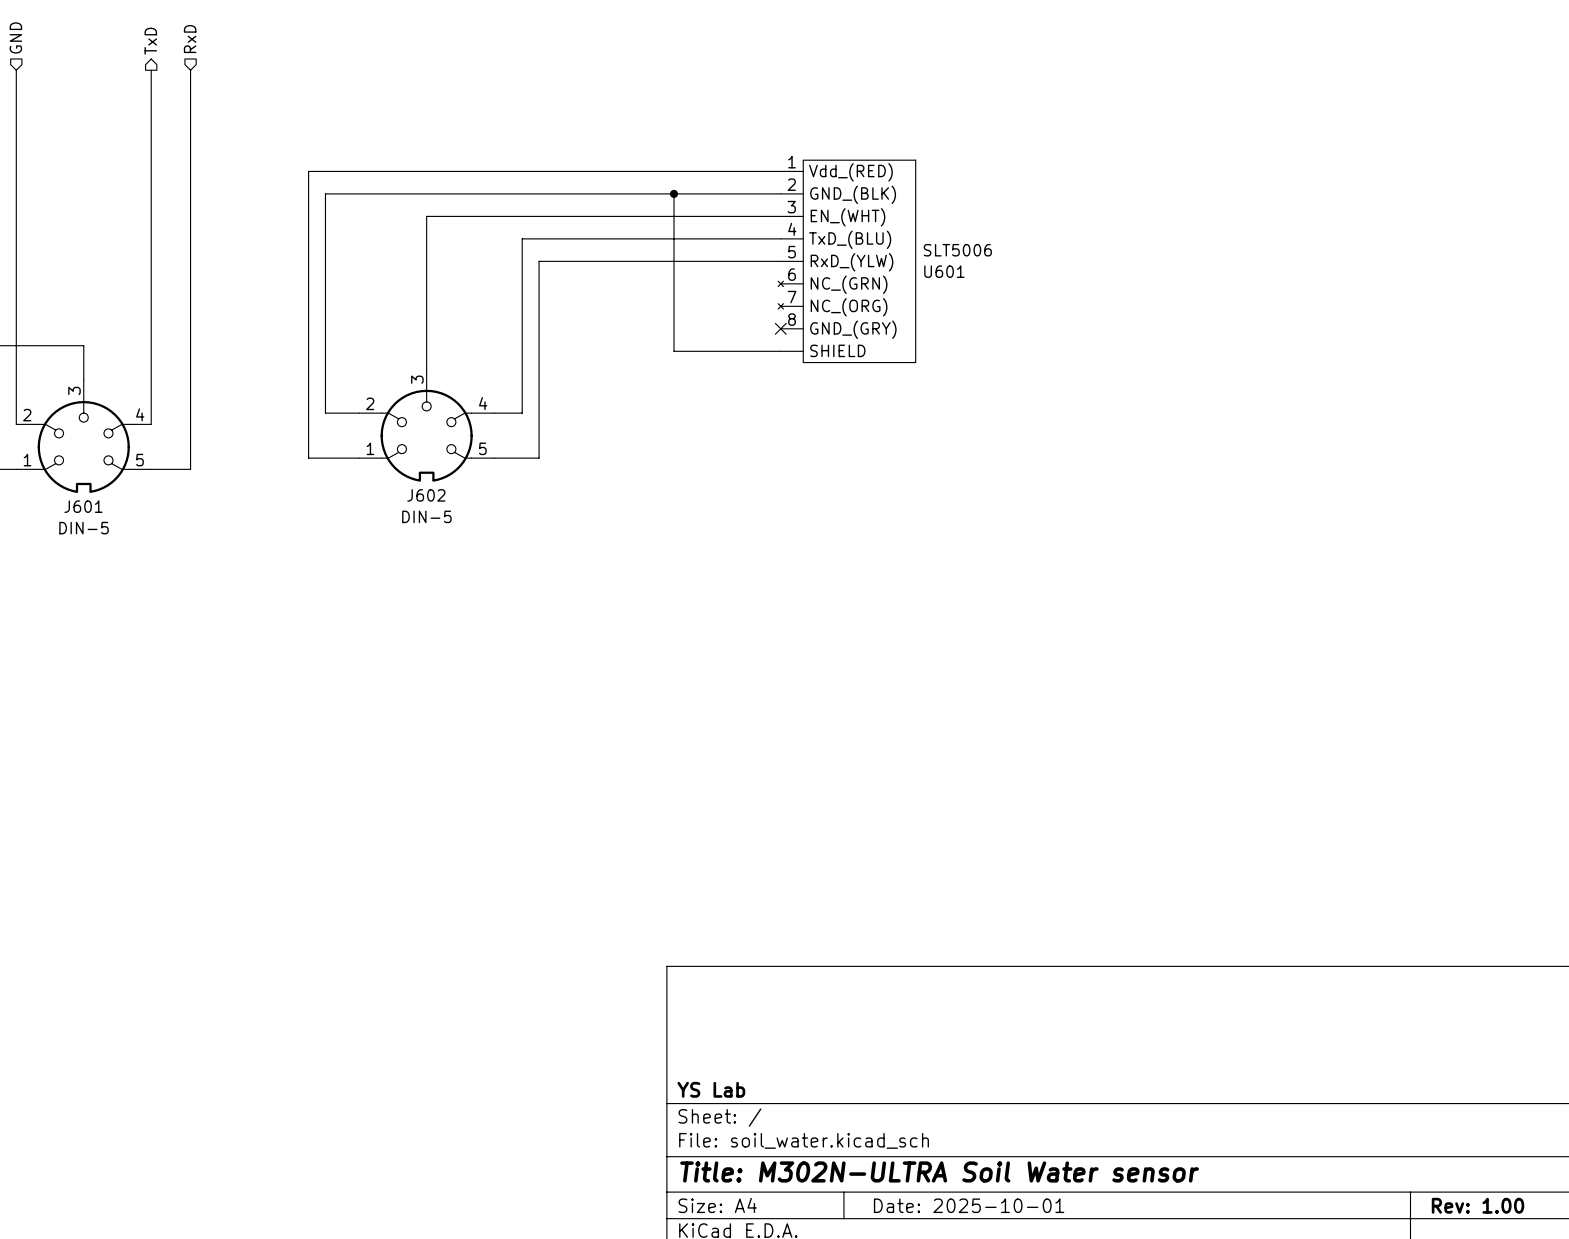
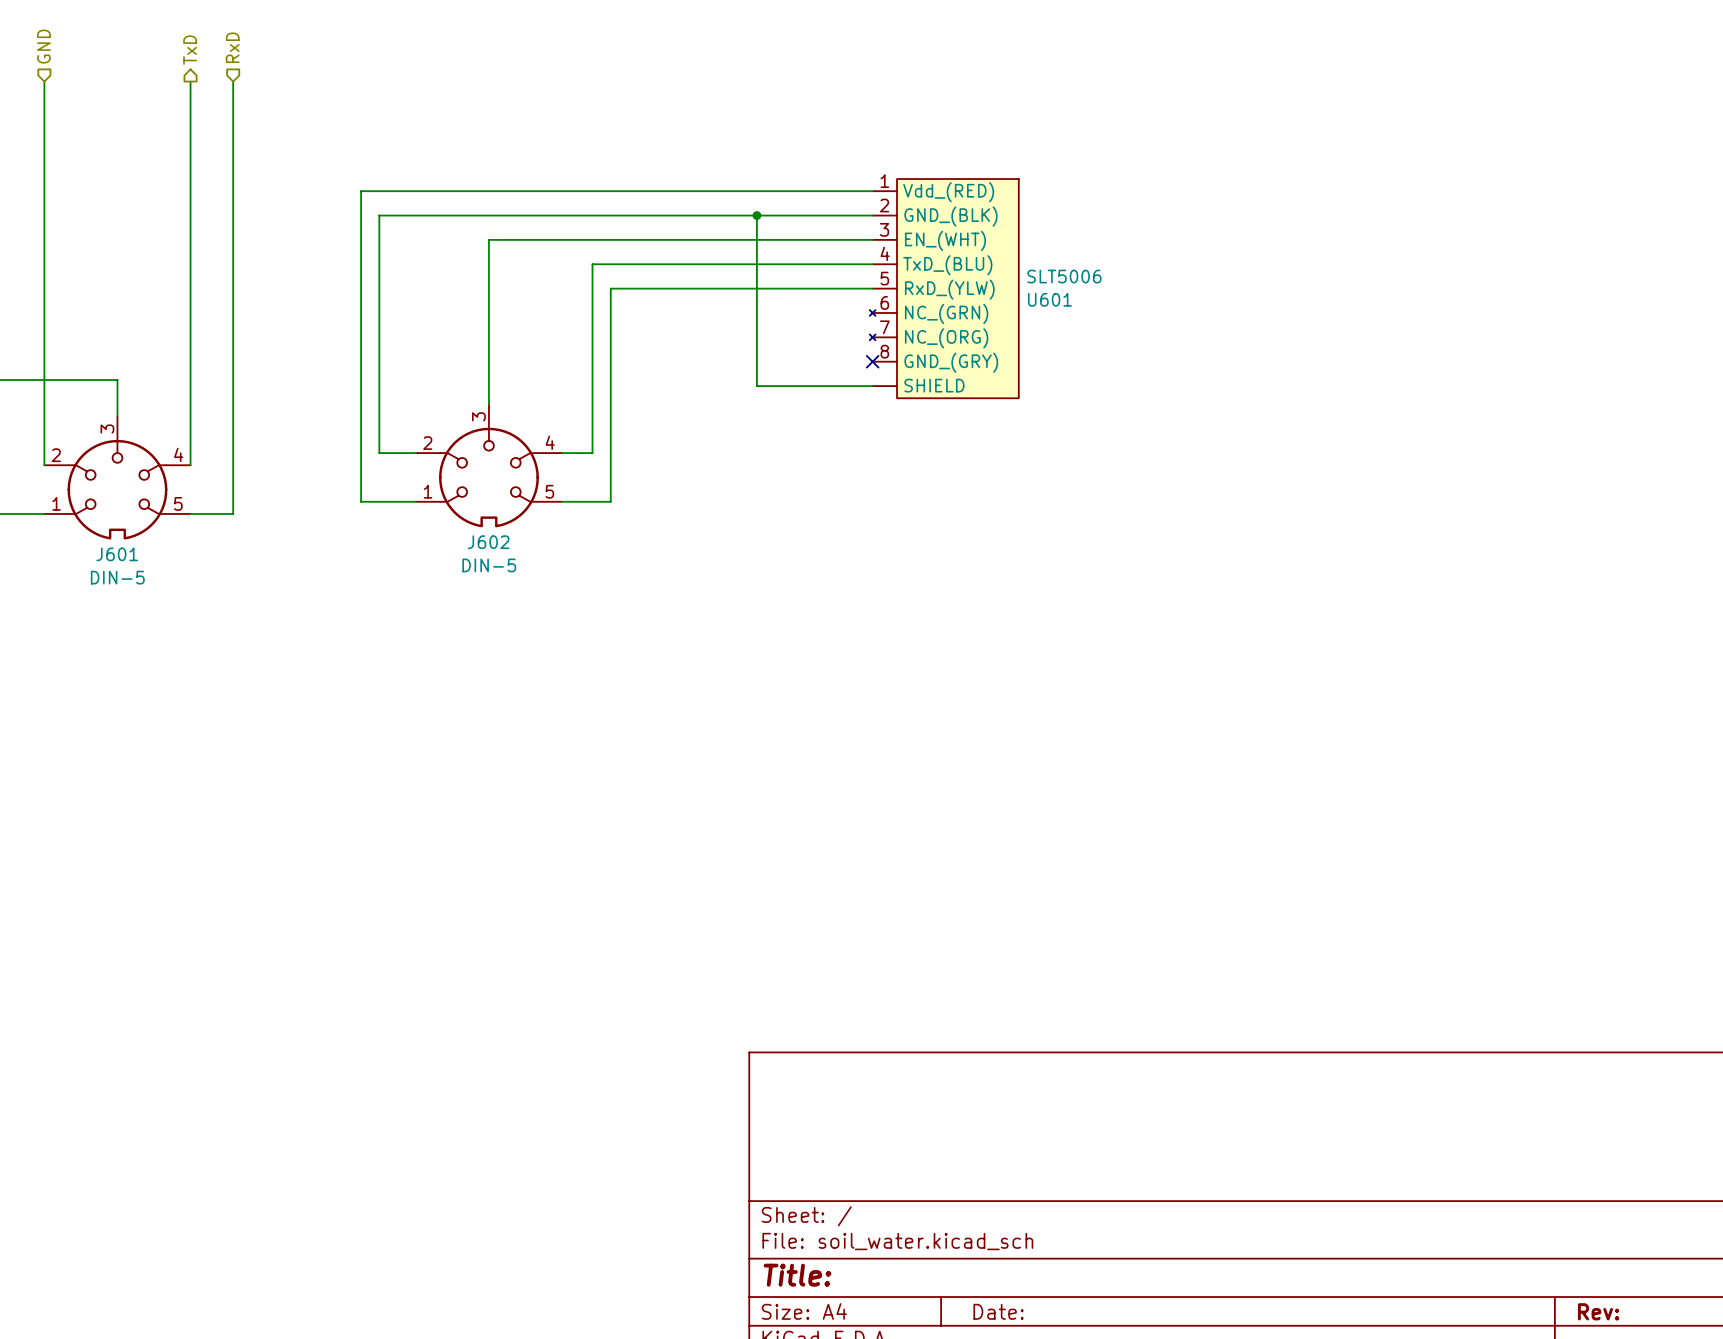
title block: YS Lab (711, 1089) -> none
title block: Title: M302N-ULTRA Soil Water sensor (939, 1171) -> Title: (797, 1275)
title block: Date: 2025-10-01 (969, 1205) -> Date: (998, 1311)
title block: Rev: 1.00 (1478, 1205) -> Rev: (1598, 1311)

